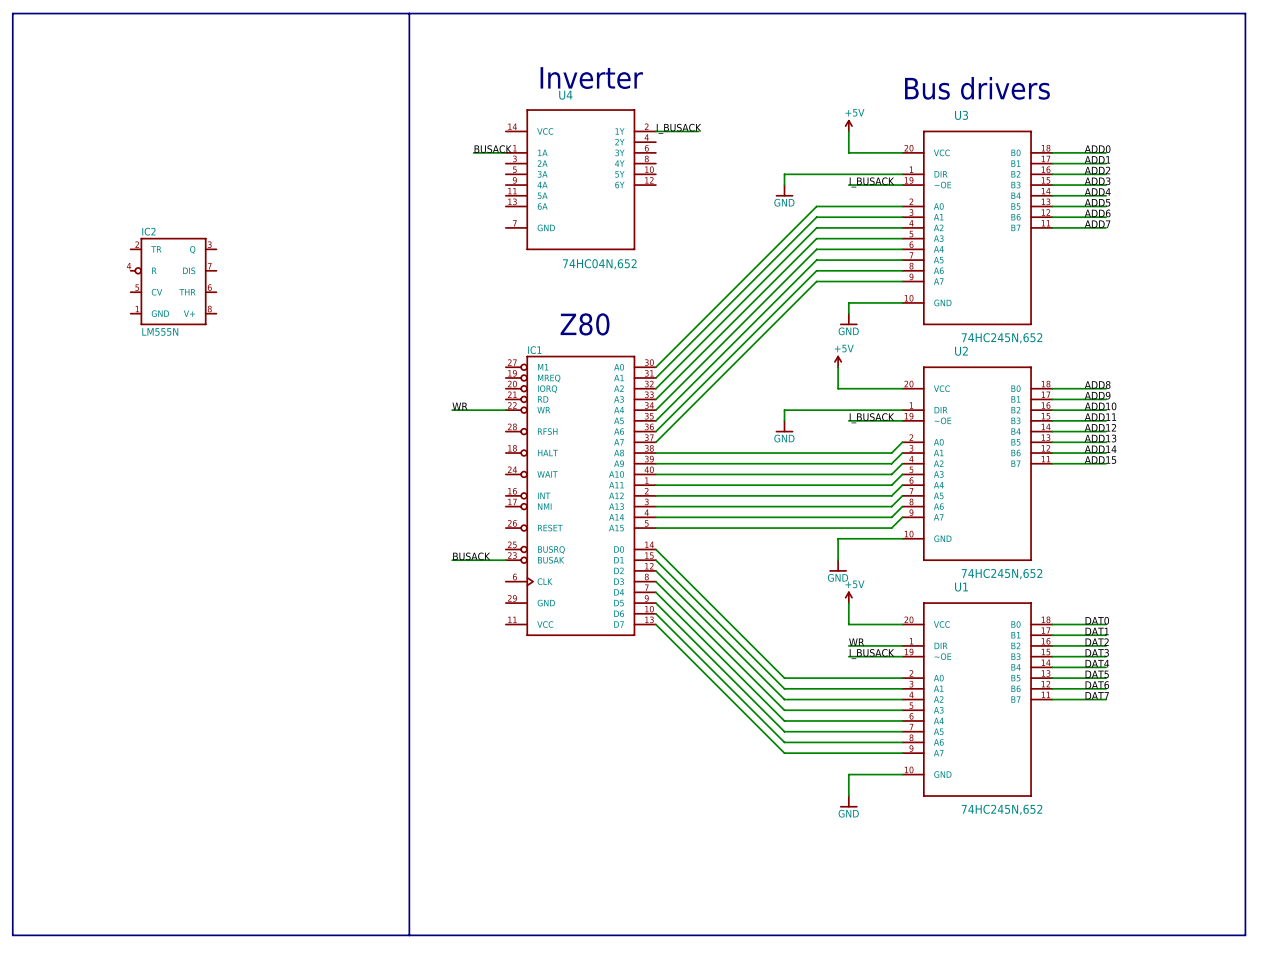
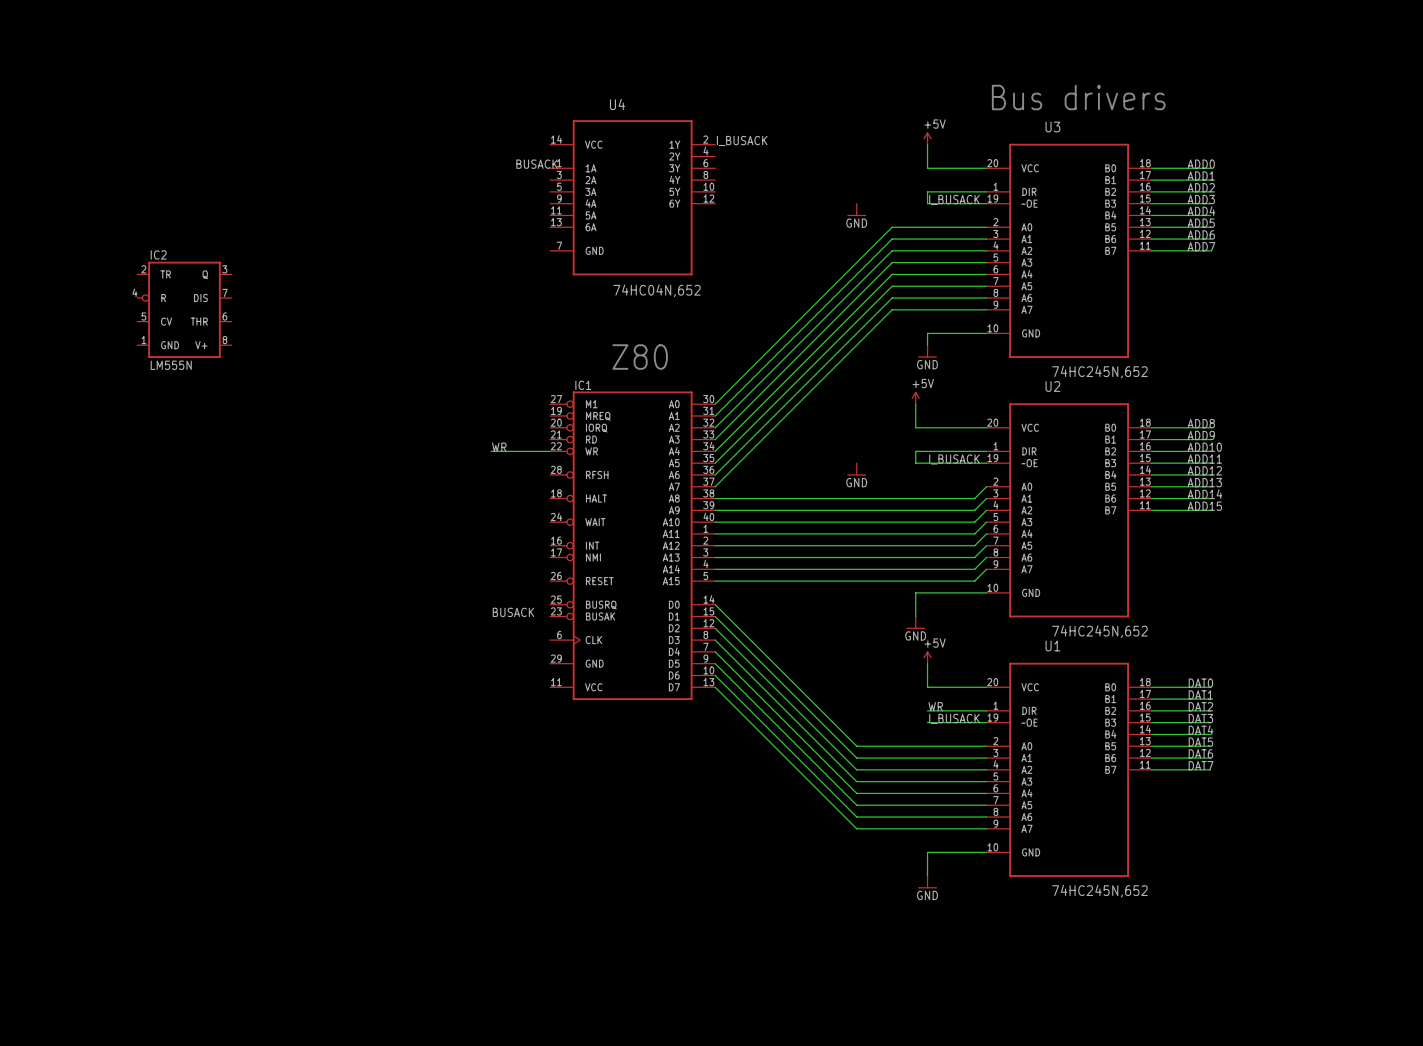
line: (12, 13) (1245, 13) (1245, 935) (12, 935) (12, 13) -> none
line: (409, 13) (409, 935) -> none
text: Inverter (591, 78) -> none
wire: (655, 131) (698, 131) -> none
wire: (473, 152) (505, 152) -> none
wire: (848, 174) (784, 174) (784, 185) -> (927, 191) (927, 203)
wire: (838, 410) (784, 410) (784, 420) -> (915, 451) (915, 463) (927, 463)
wire: (452, 560) (505, 560) -> none

